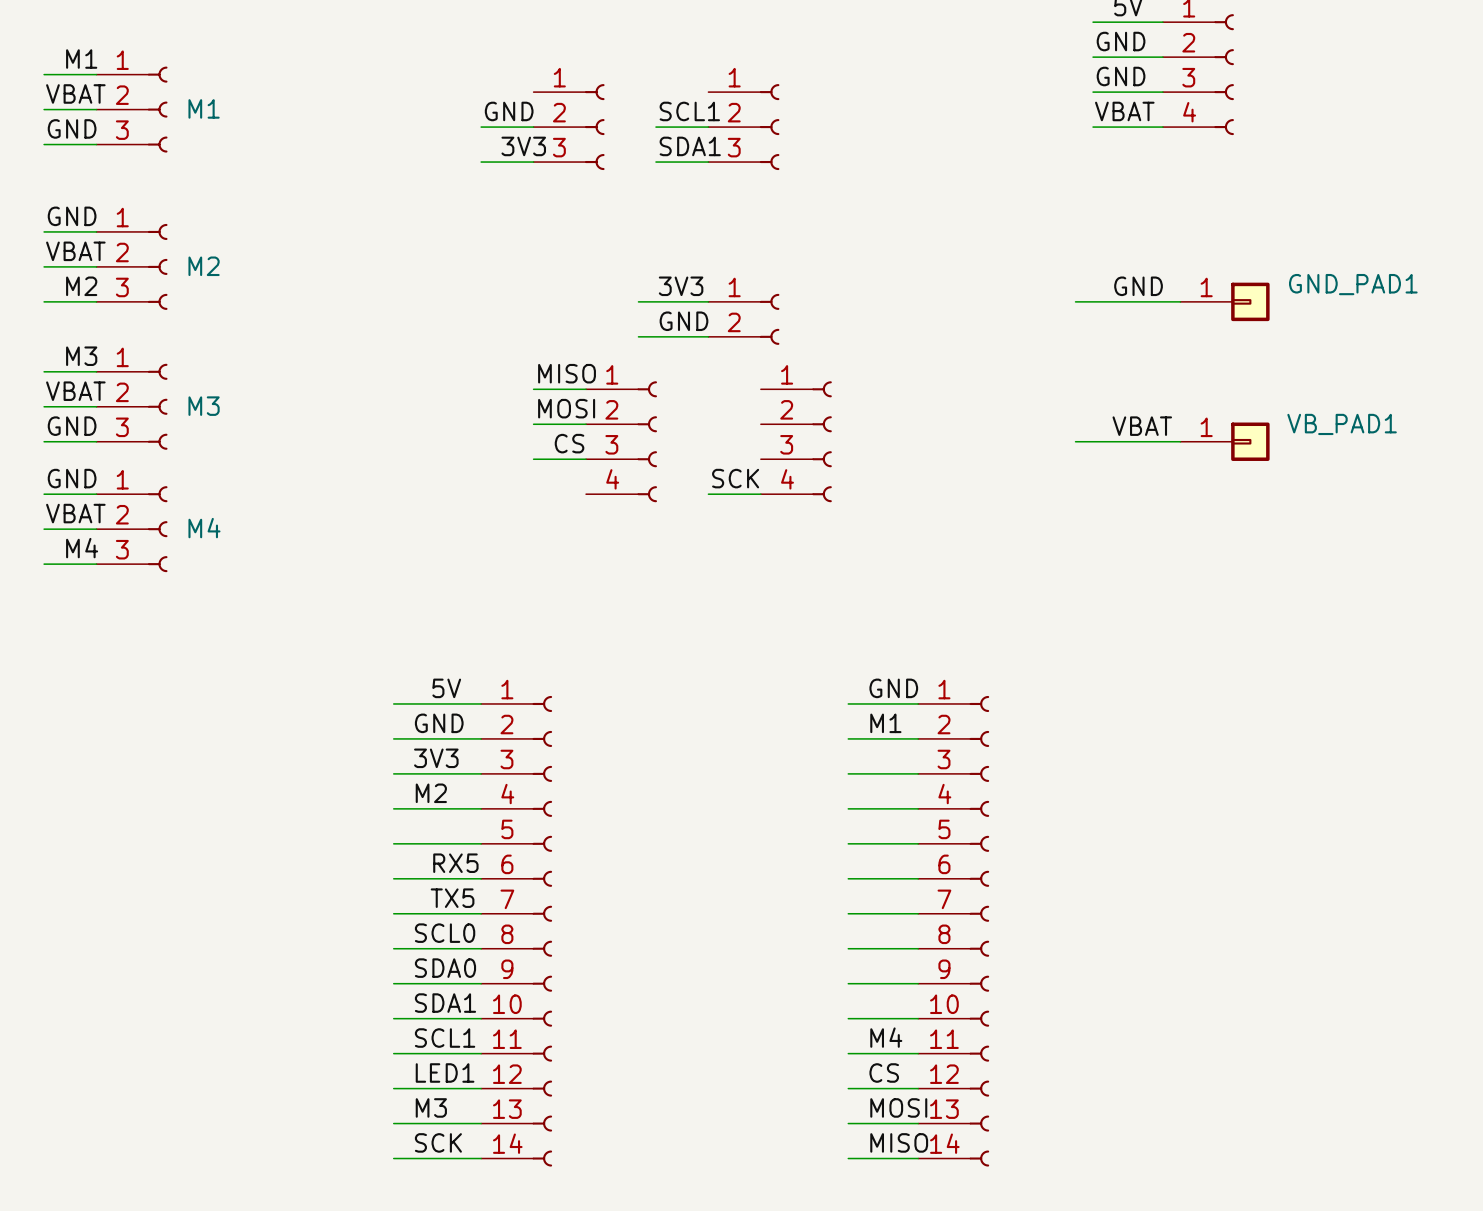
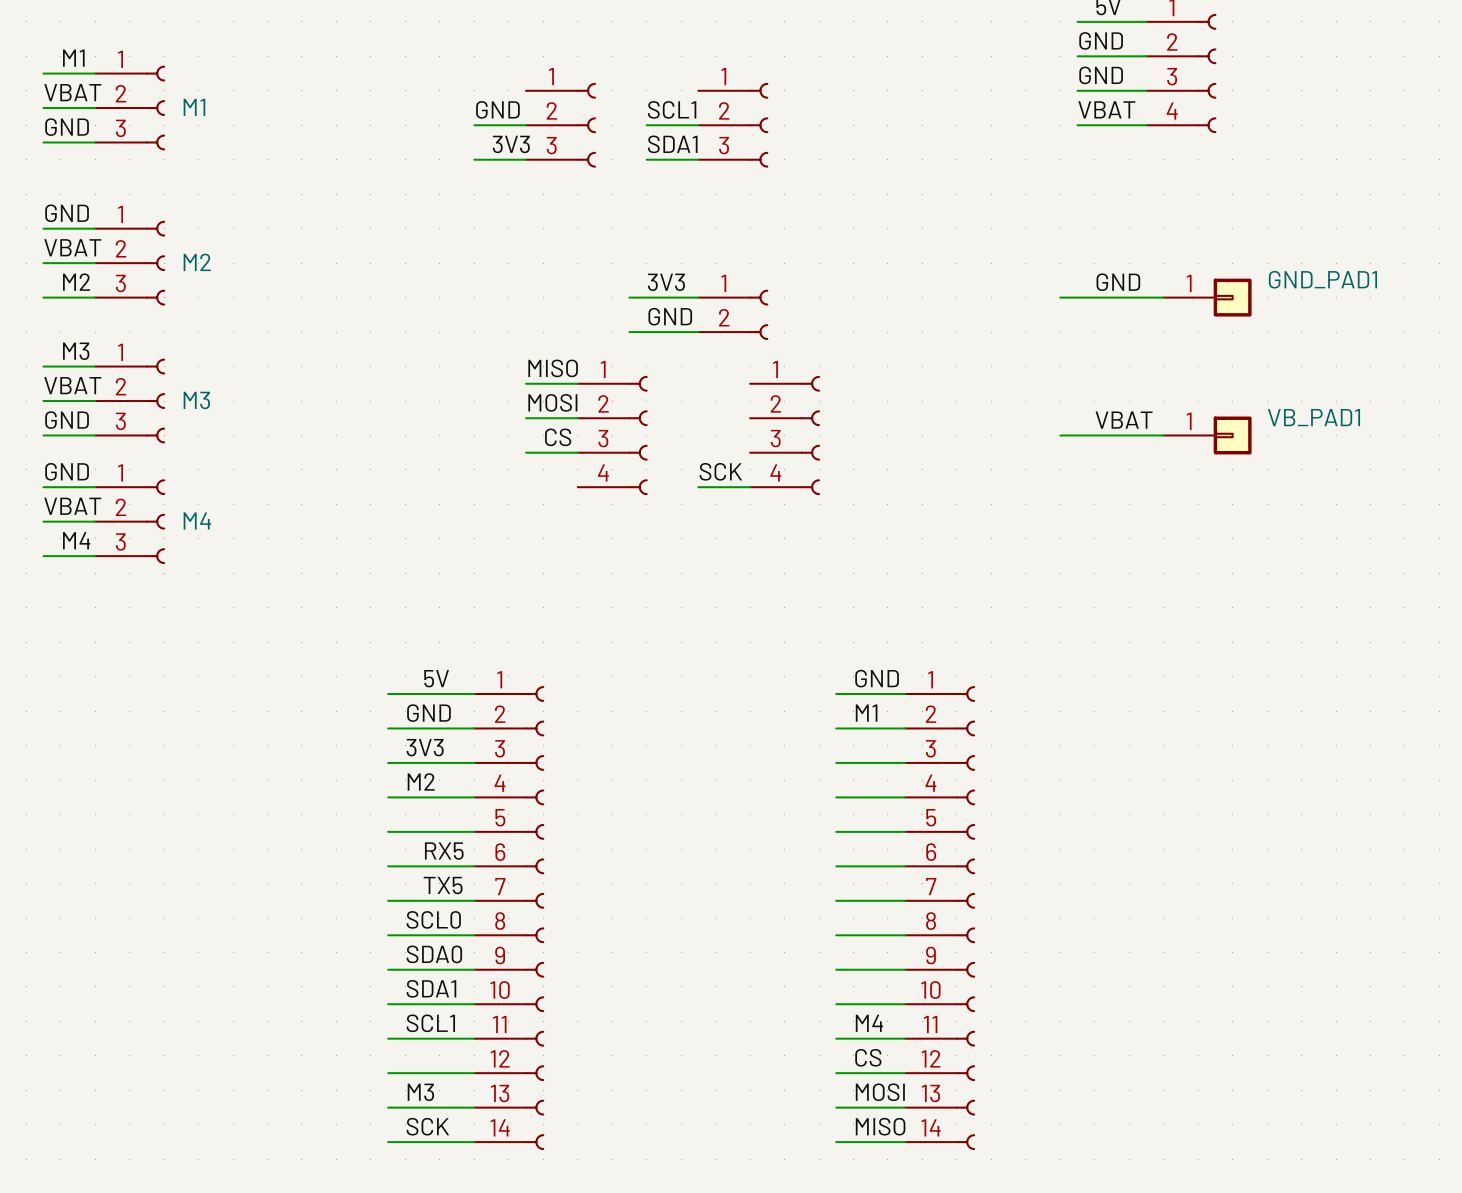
label: LED1 (445, 1072) -> none

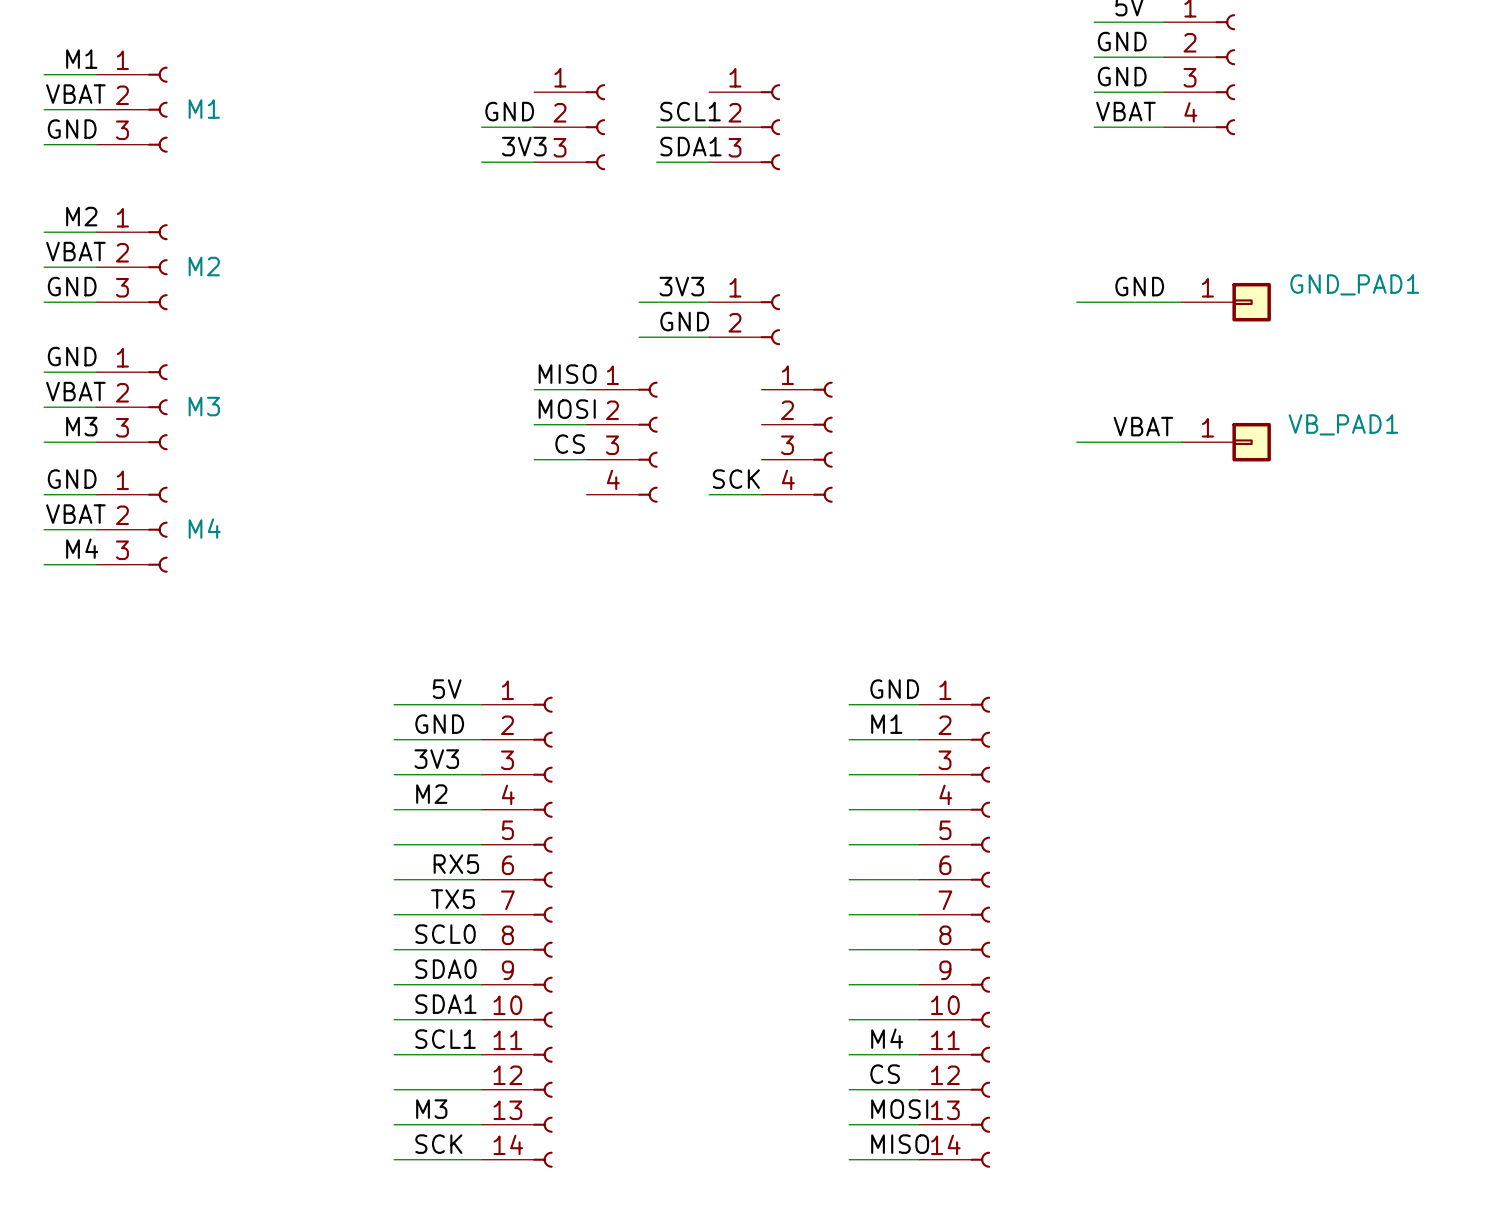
label: GND (67, 213) -> none
label: none -> GND (72, 286)
label position: M2 (76, 282) -> M2 (81, 216)
label: none -> GND (72, 356)
label position: M3 (76, 351) -> M3 (81, 426)
label: GND (67, 420) -> none

